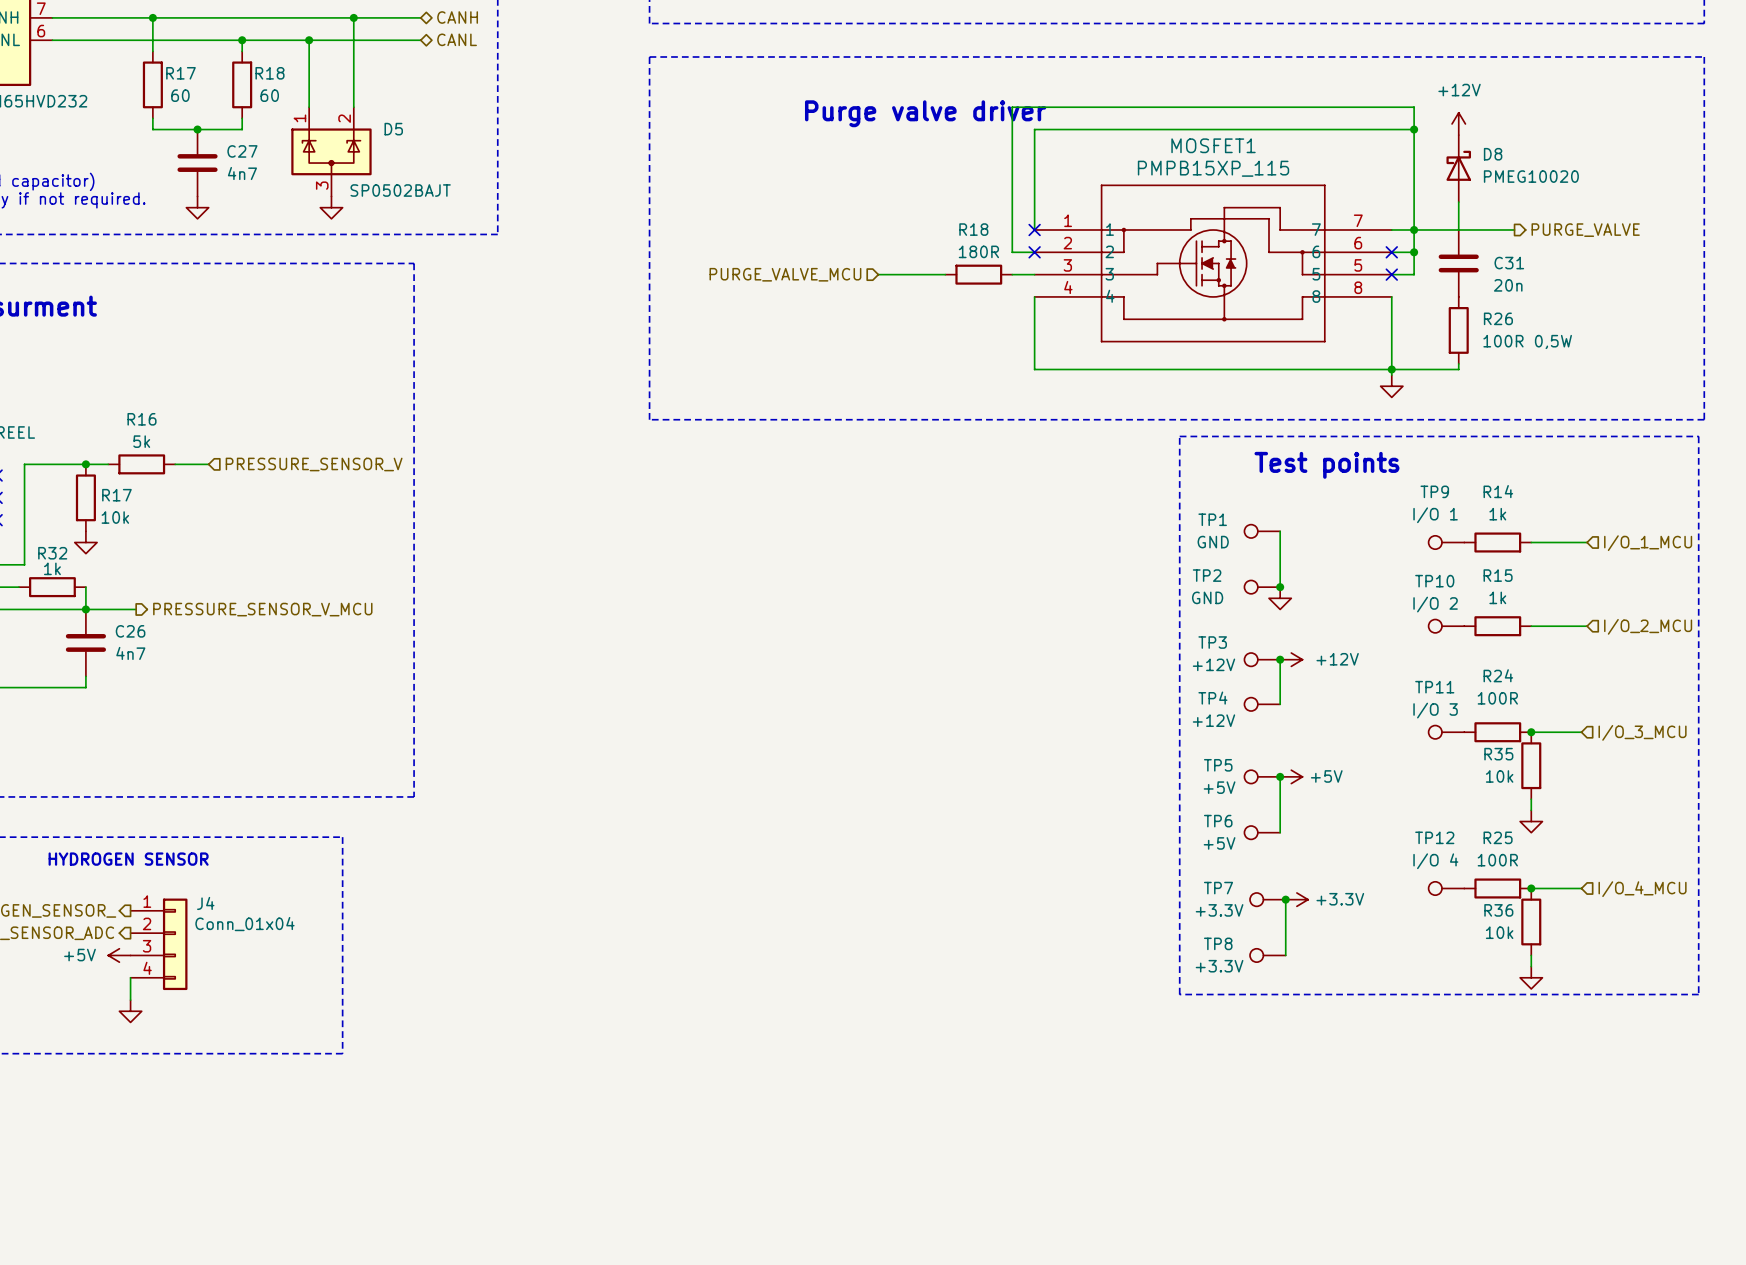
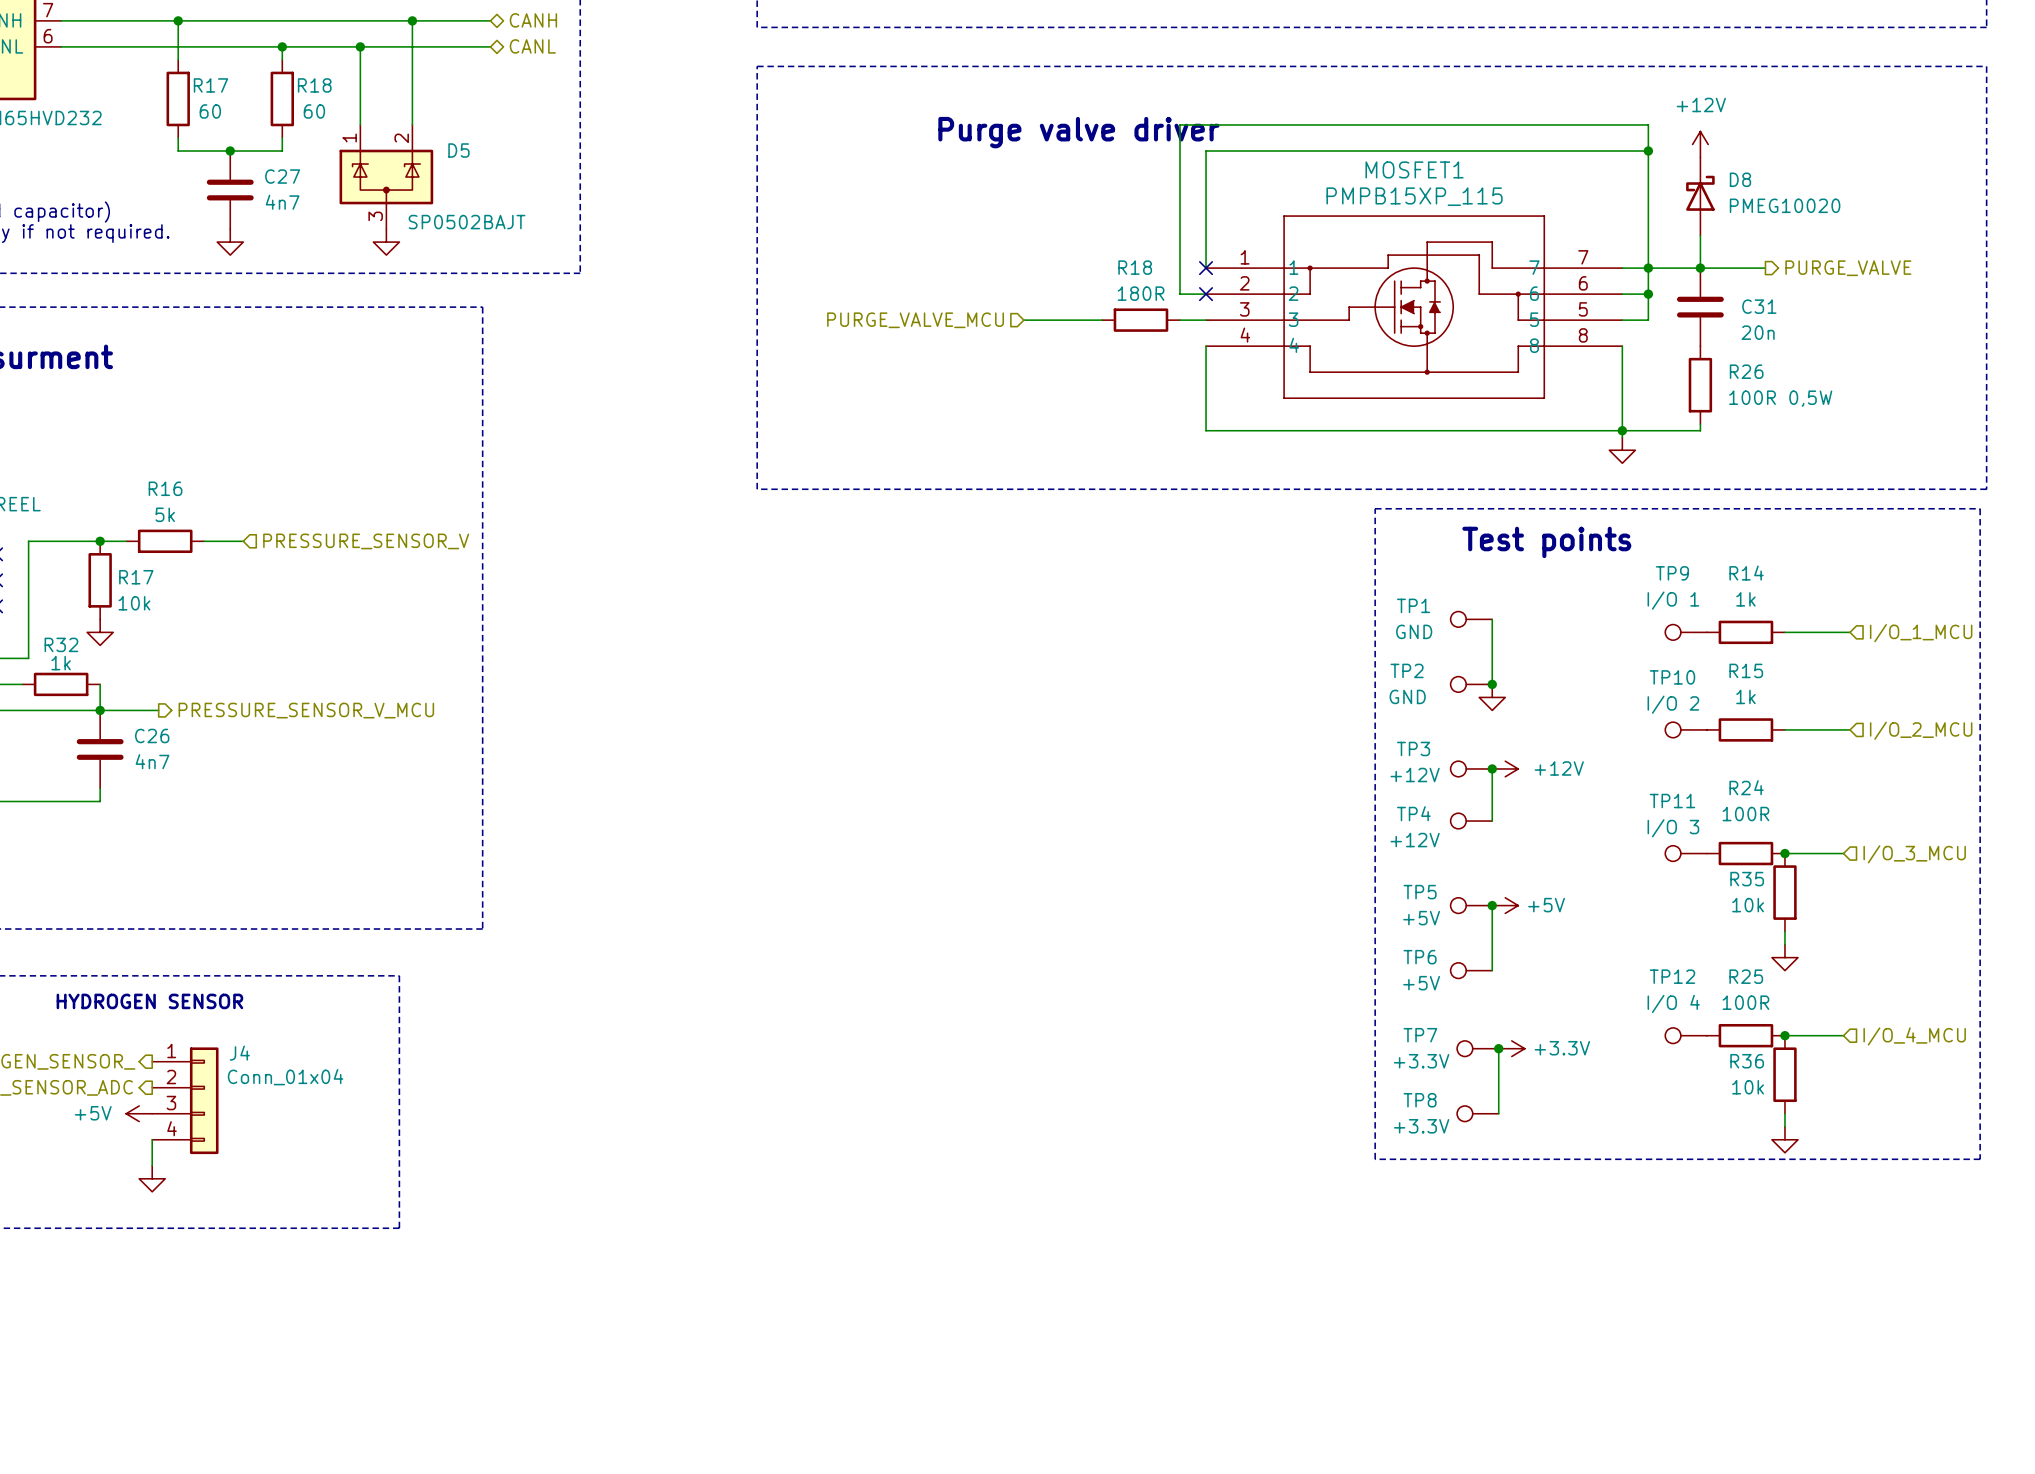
junction: none -> (1700, 268)
no-connect mark: (1391, 252) -> none
no-connect mark: (1391, 274) -> none

